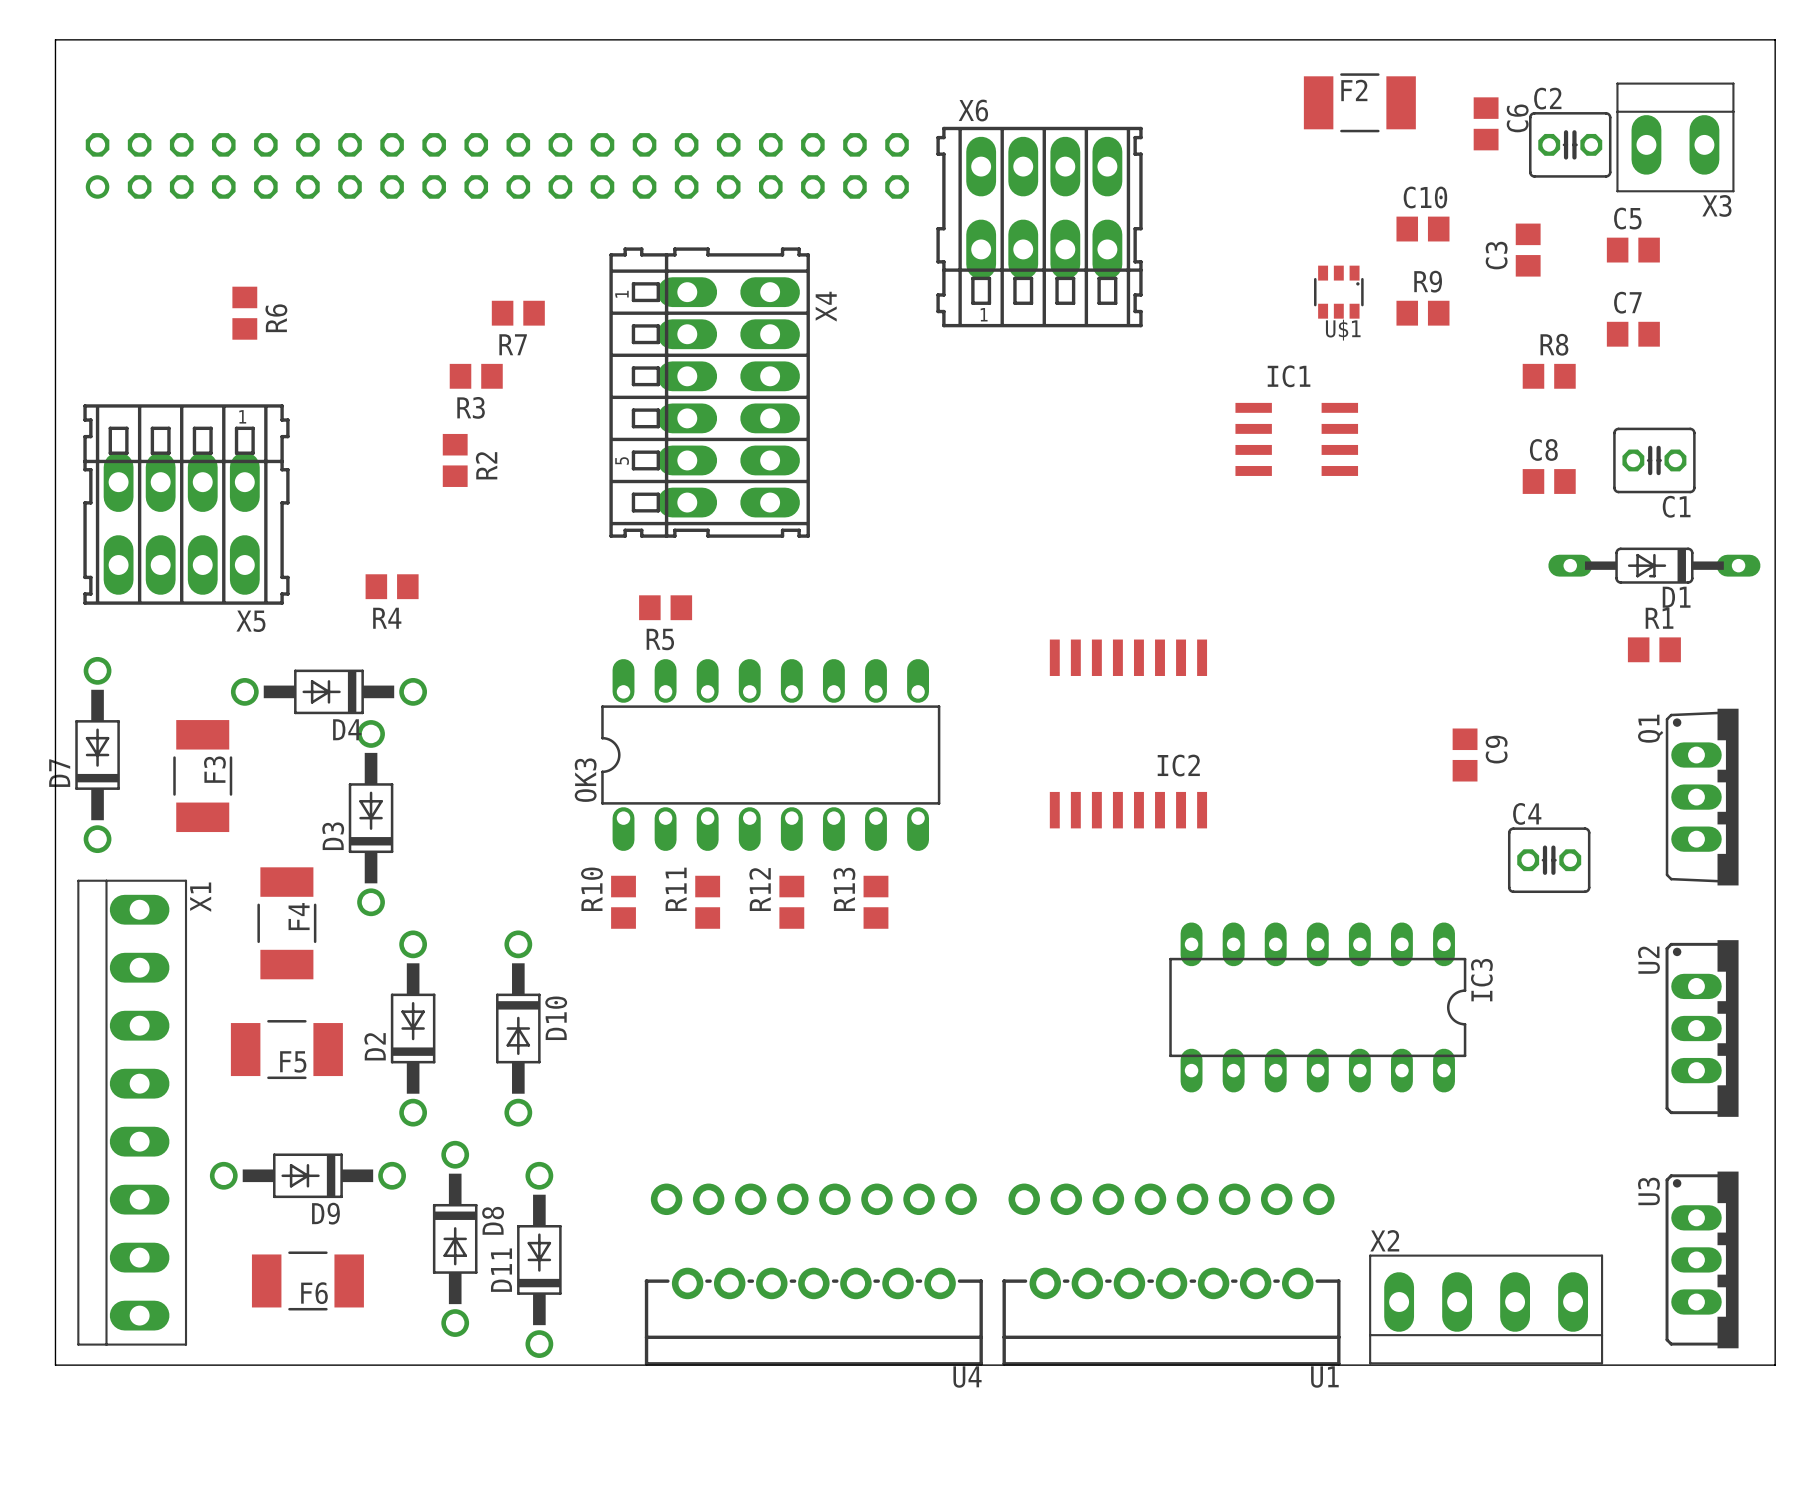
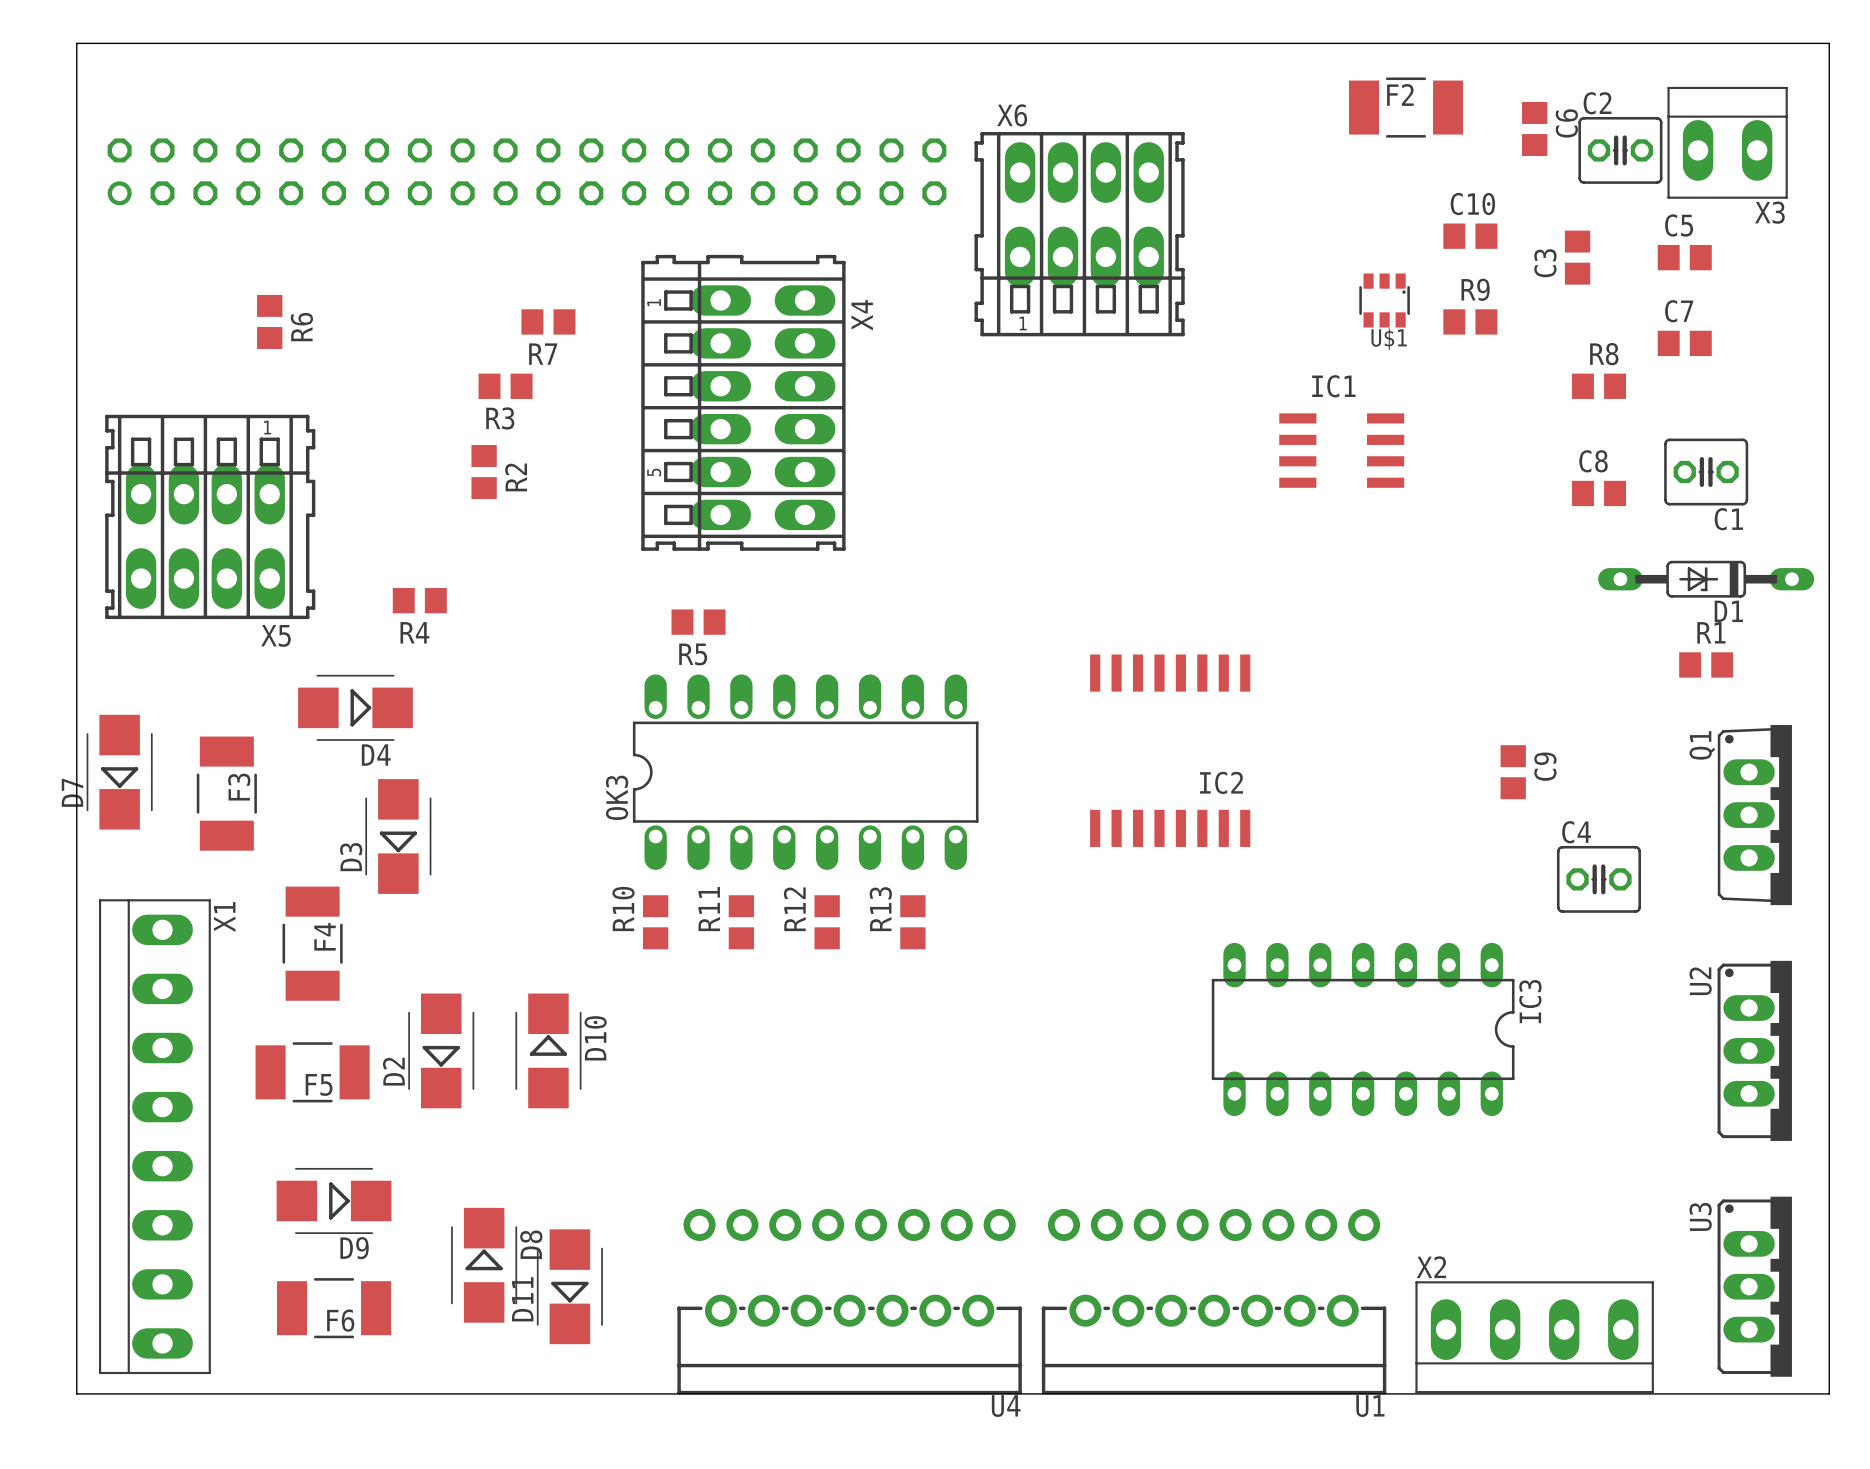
D7 footprint: [75, 656, 120, 854] -> [86, 714, 153, 830]
D4 footprint: [230, 669, 428, 715] -> [298, 674, 413, 741]
D3 footprint: [348, 720, 394, 917] -> [365, 779, 432, 894]
D2 footprint: [390, 930, 436, 1127] -> [408, 993, 475, 1109]
D10 footprint: [496, 930, 541, 1127] -> [515, 993, 582, 1109]
D8 footprint: [432, 1140, 478, 1337] -> [451, 1207, 518, 1323]
D9 footprint: [209, 1153, 406, 1199] -> [276, 1167, 392, 1234]
D11 footprint: [517, 1161, 562, 1358] -> [536, 1229, 603, 1345]

